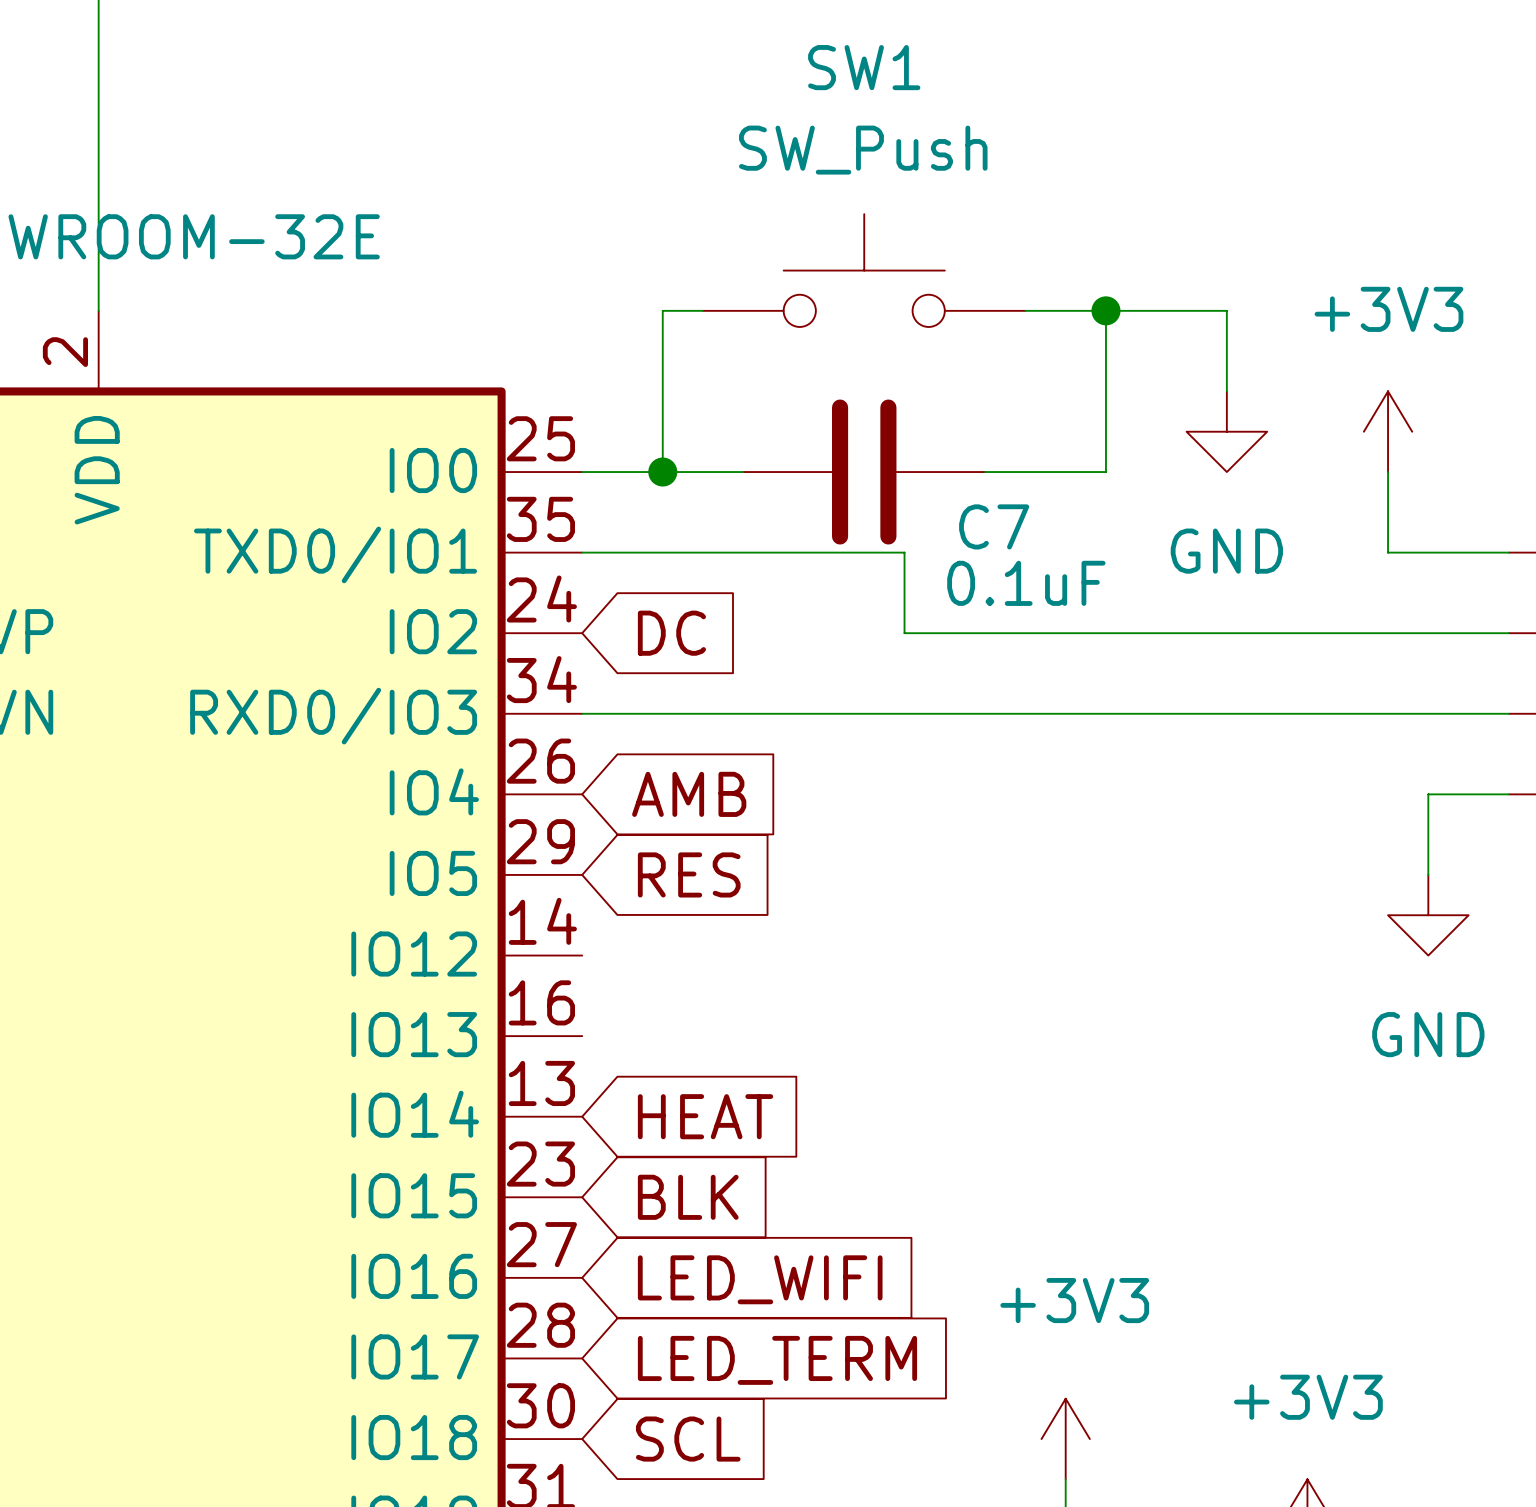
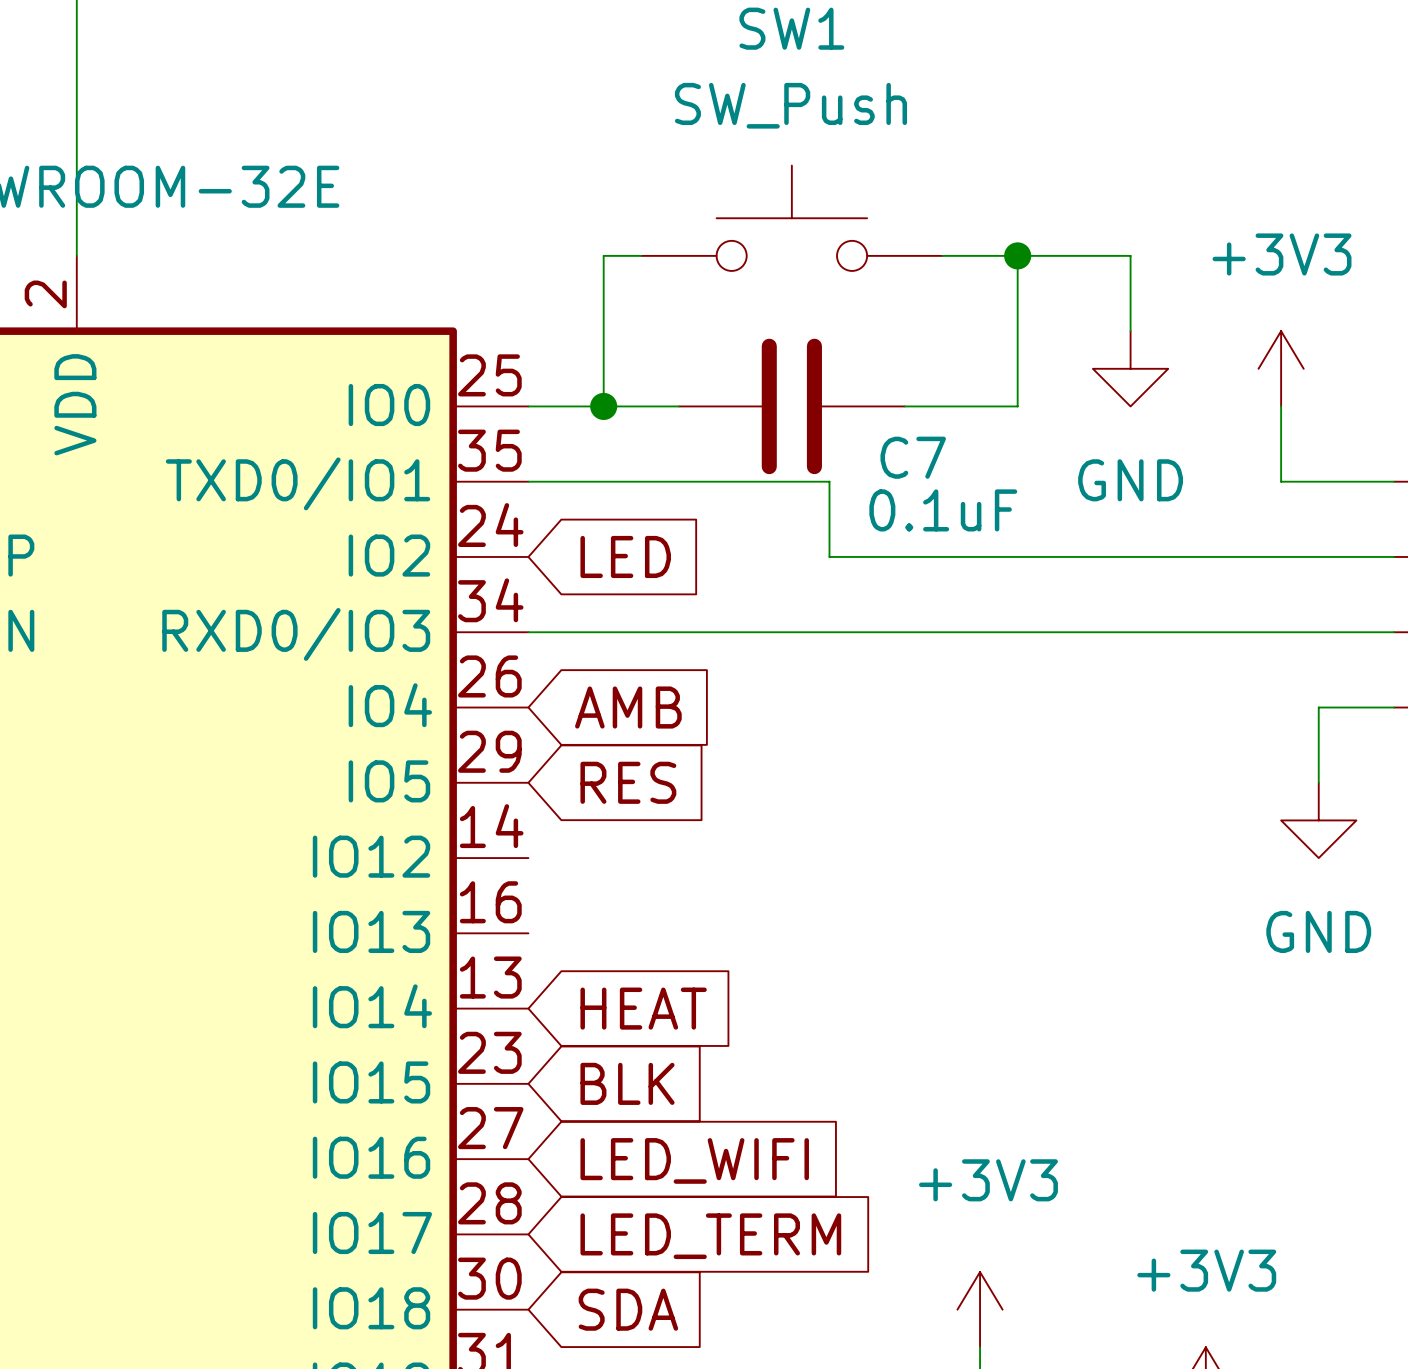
global label: DC (671, 633) -> LED (625, 556)
global label: SCL (688, 1439) -> SDA (628, 1309)

